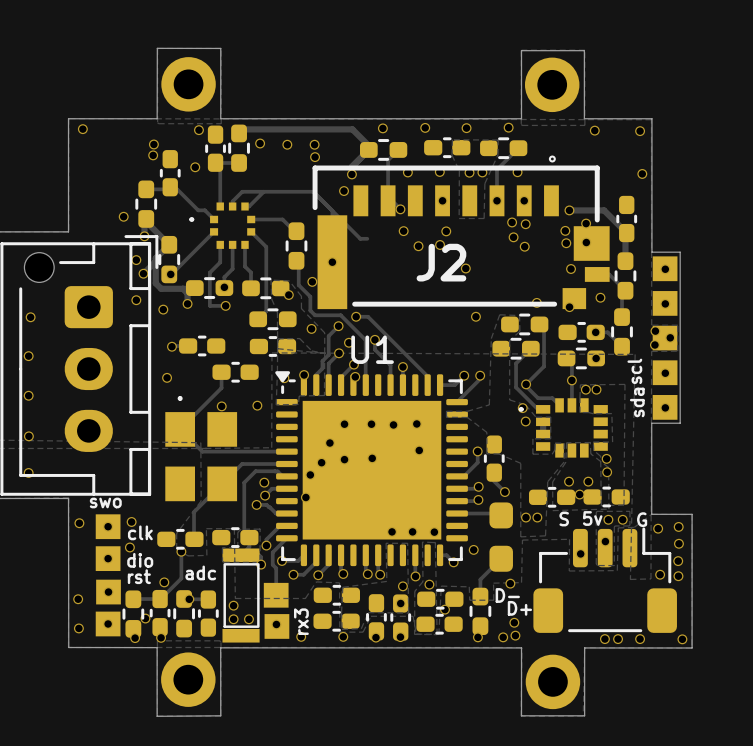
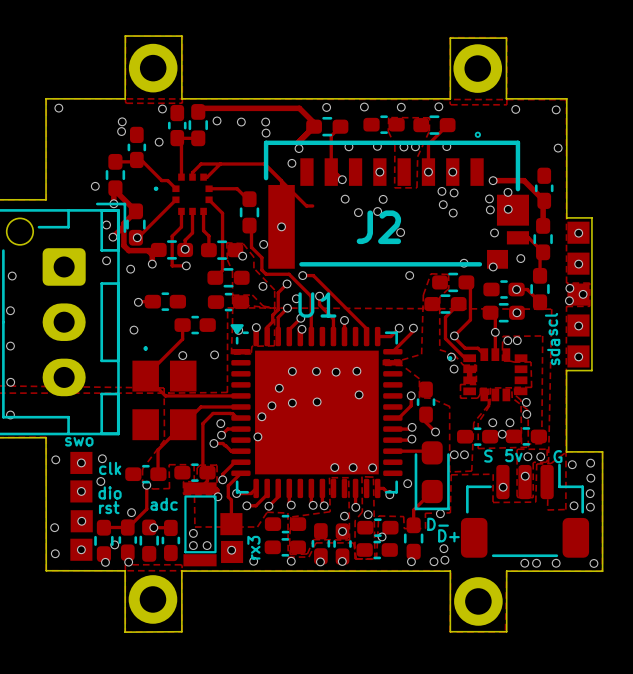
part footprint: [489, 502, 513, 572] -> [414, 441, 450, 511]

